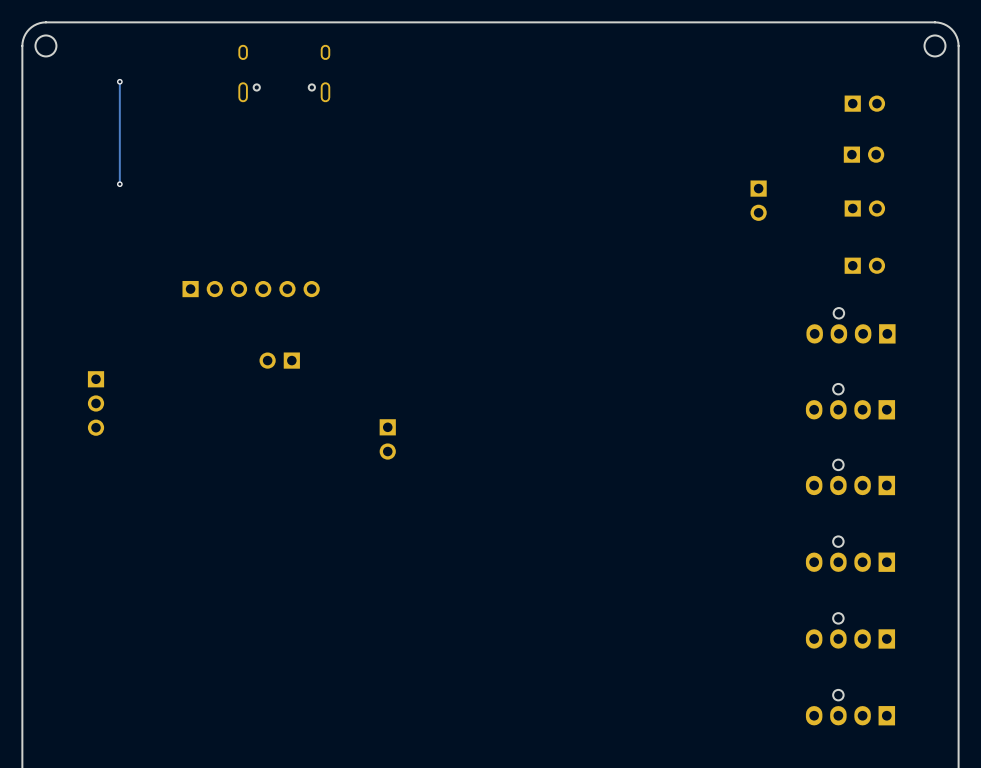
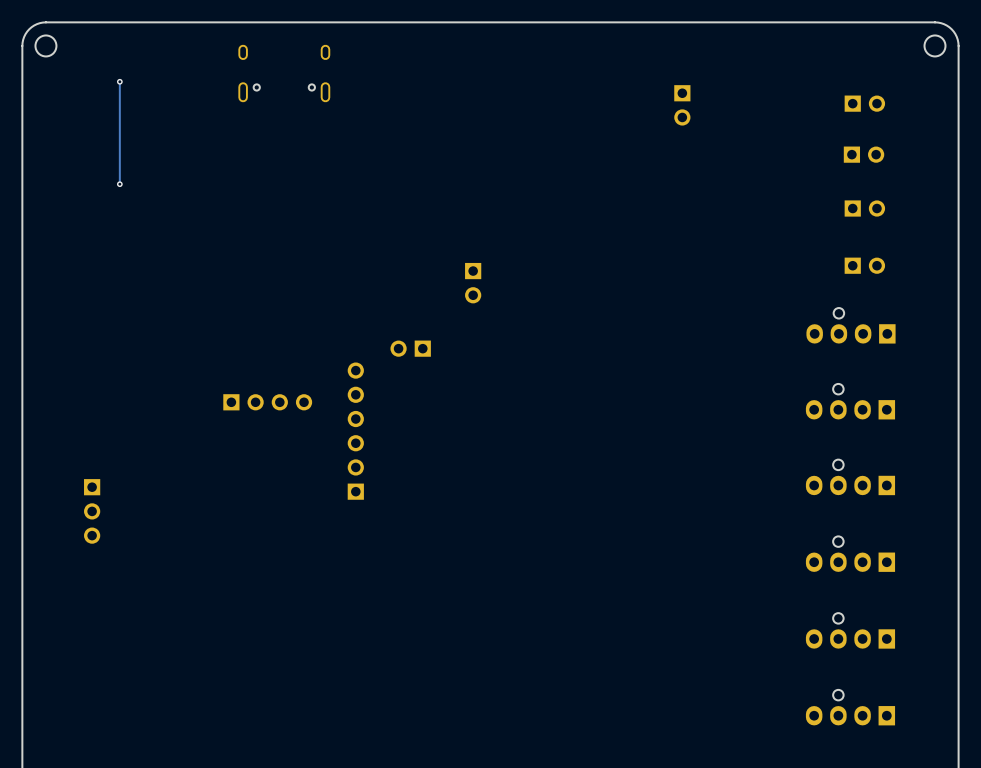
part position: (758, 200) -> (682, 105)
part: none -> (473, 283)
part rotation: 0° (251, 289) -> 90° counterclockwise (355, 431)
part position: (251, 289) -> (355, 431)
part: none -> (410, 348)
part: (279, 360) -> none
part: none -> (267, 402)
part position: (96, 403) -> (92, 511)
part: (387, 439) -> none

